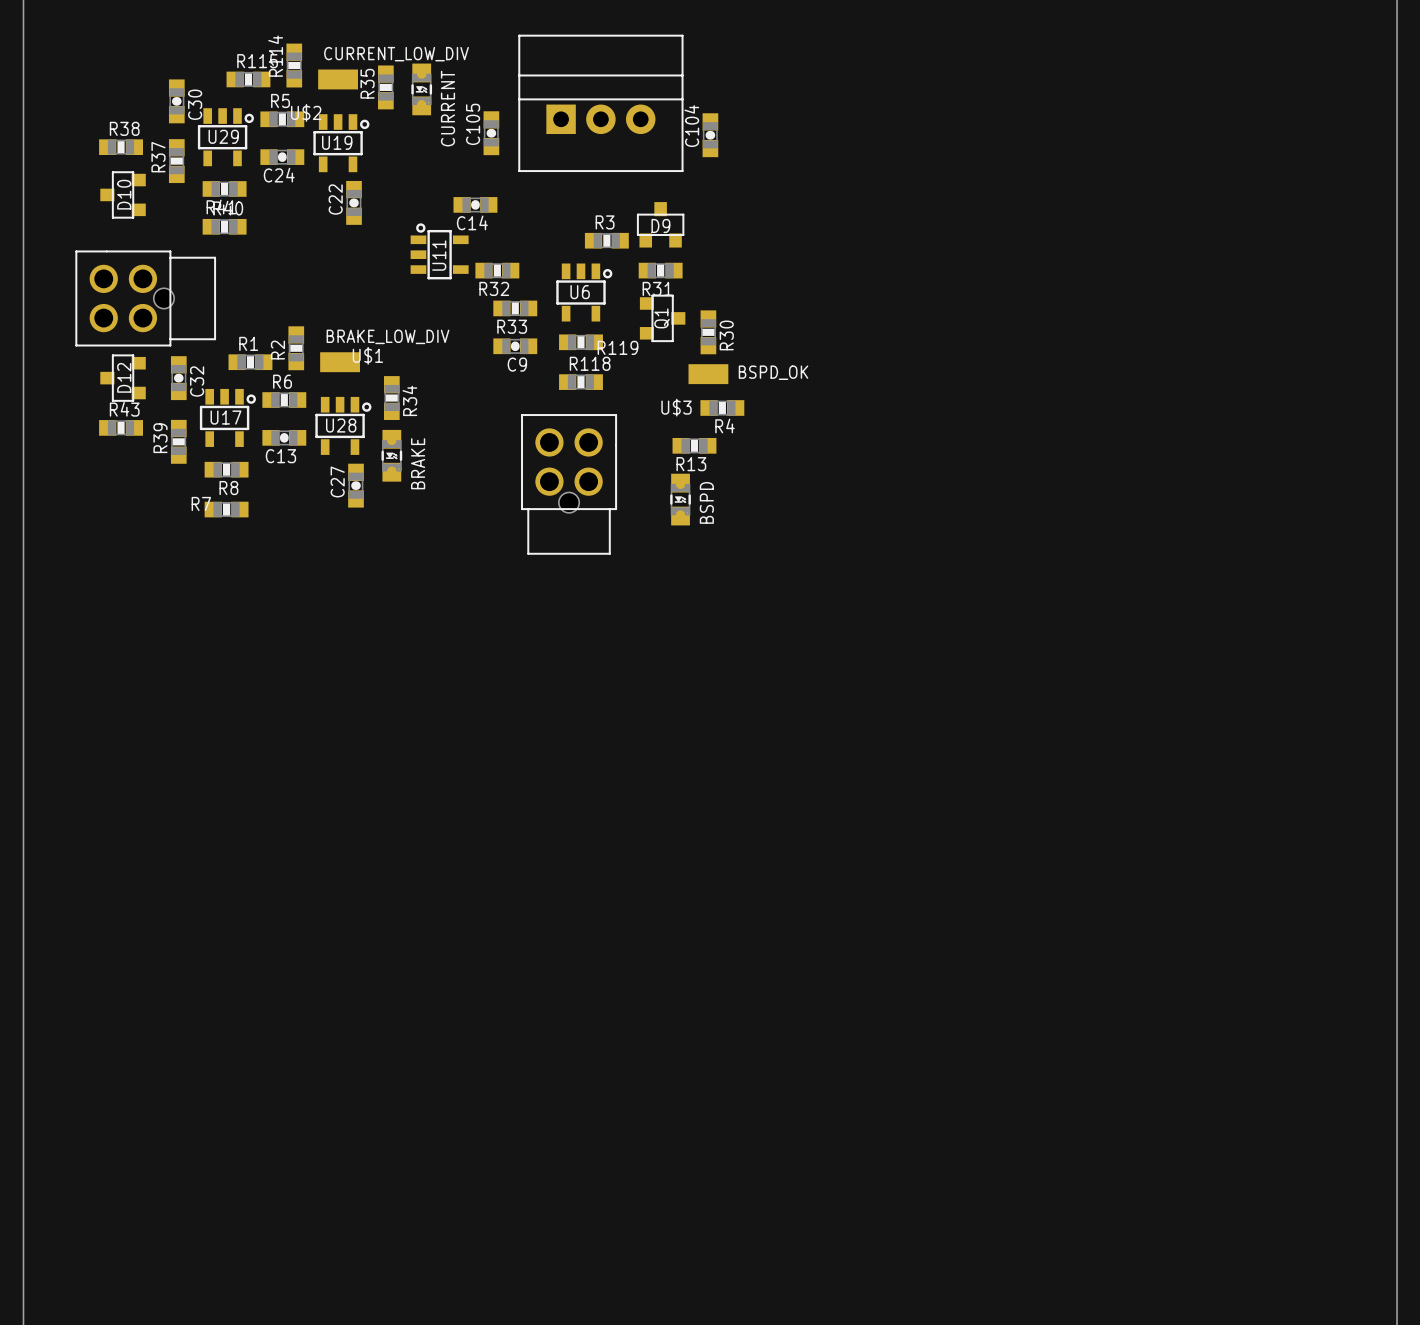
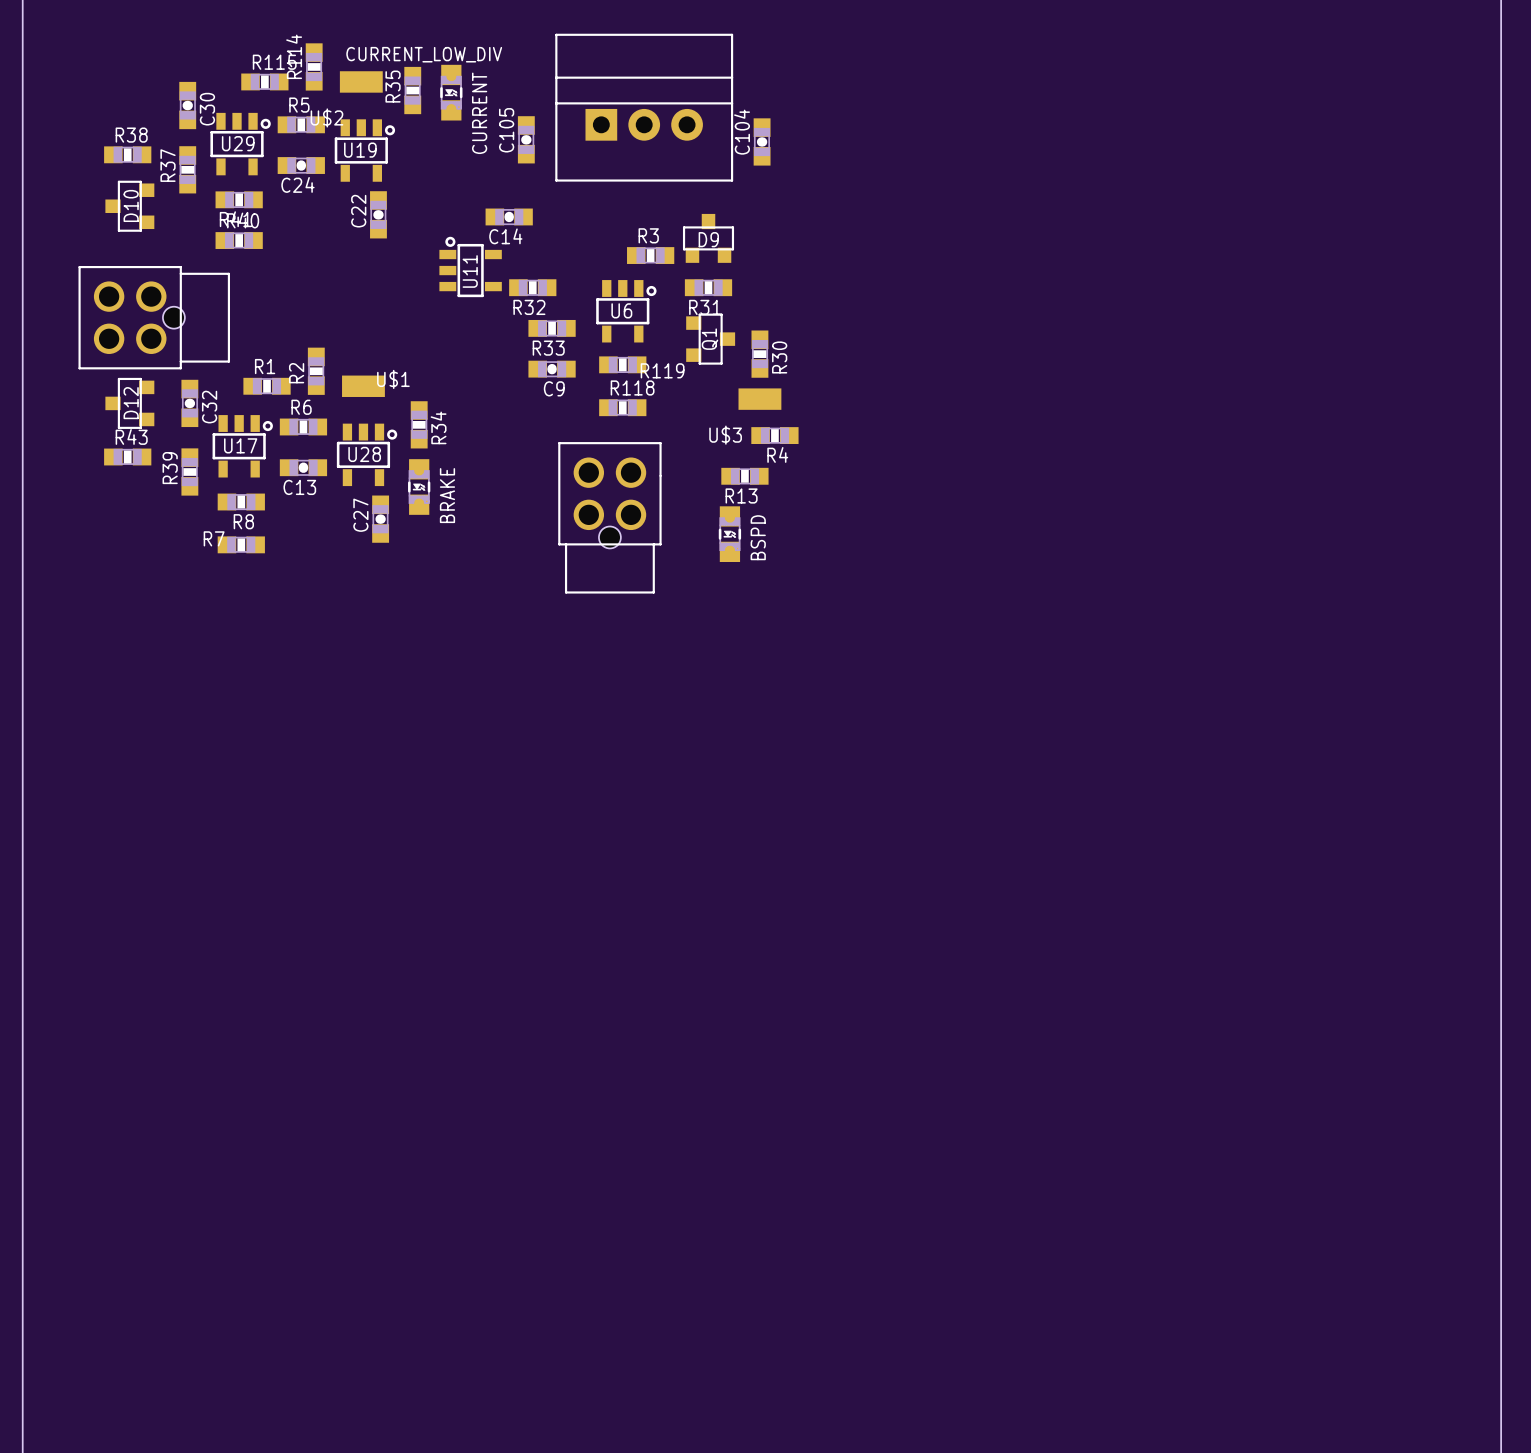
text: BRAKE_LOW_DIV (388, 336) -> none
text: BSPD_OK (773, 372) -> none

